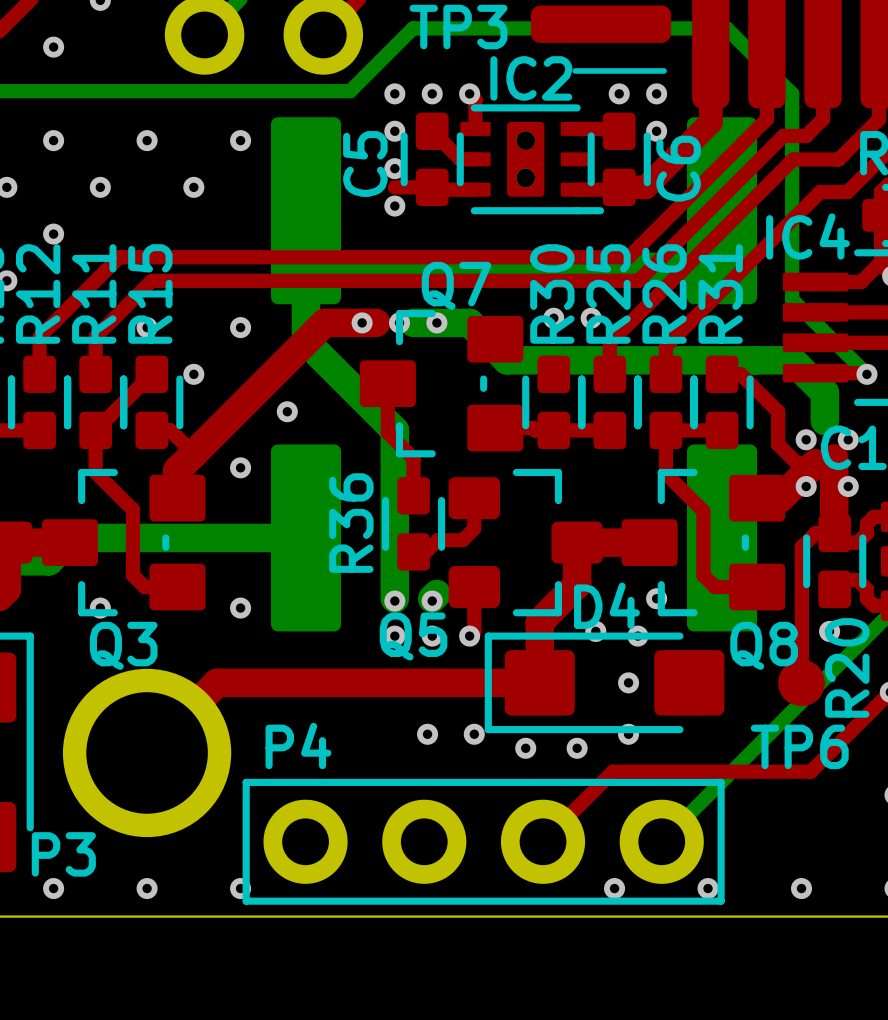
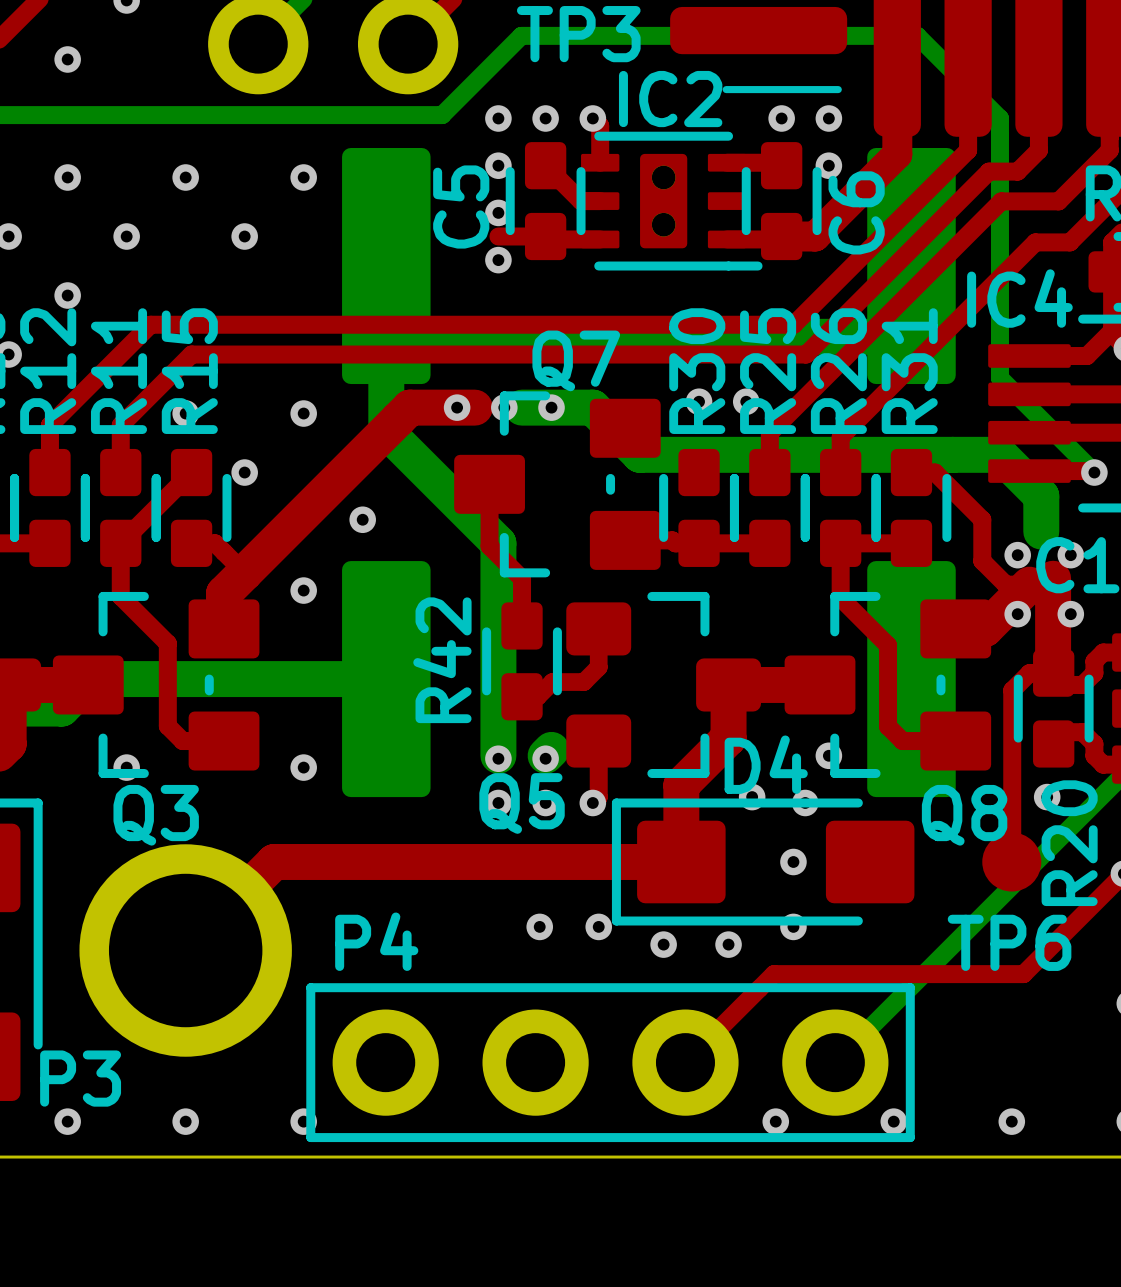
R36 name: R36 (351, 523) -> R42 (442, 660)

